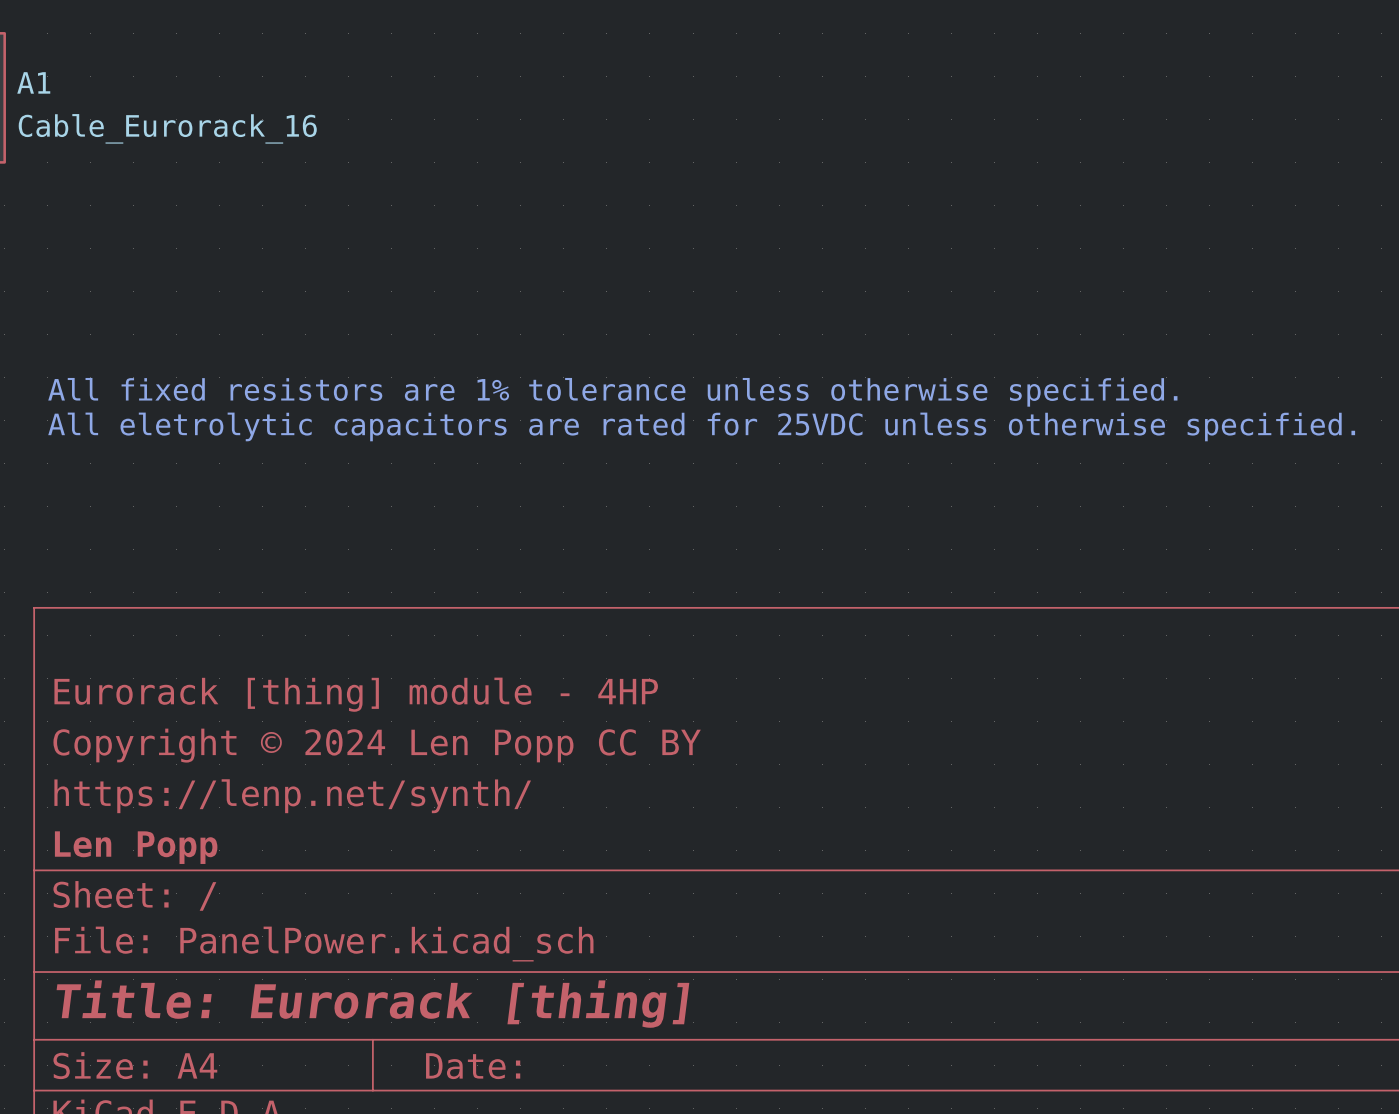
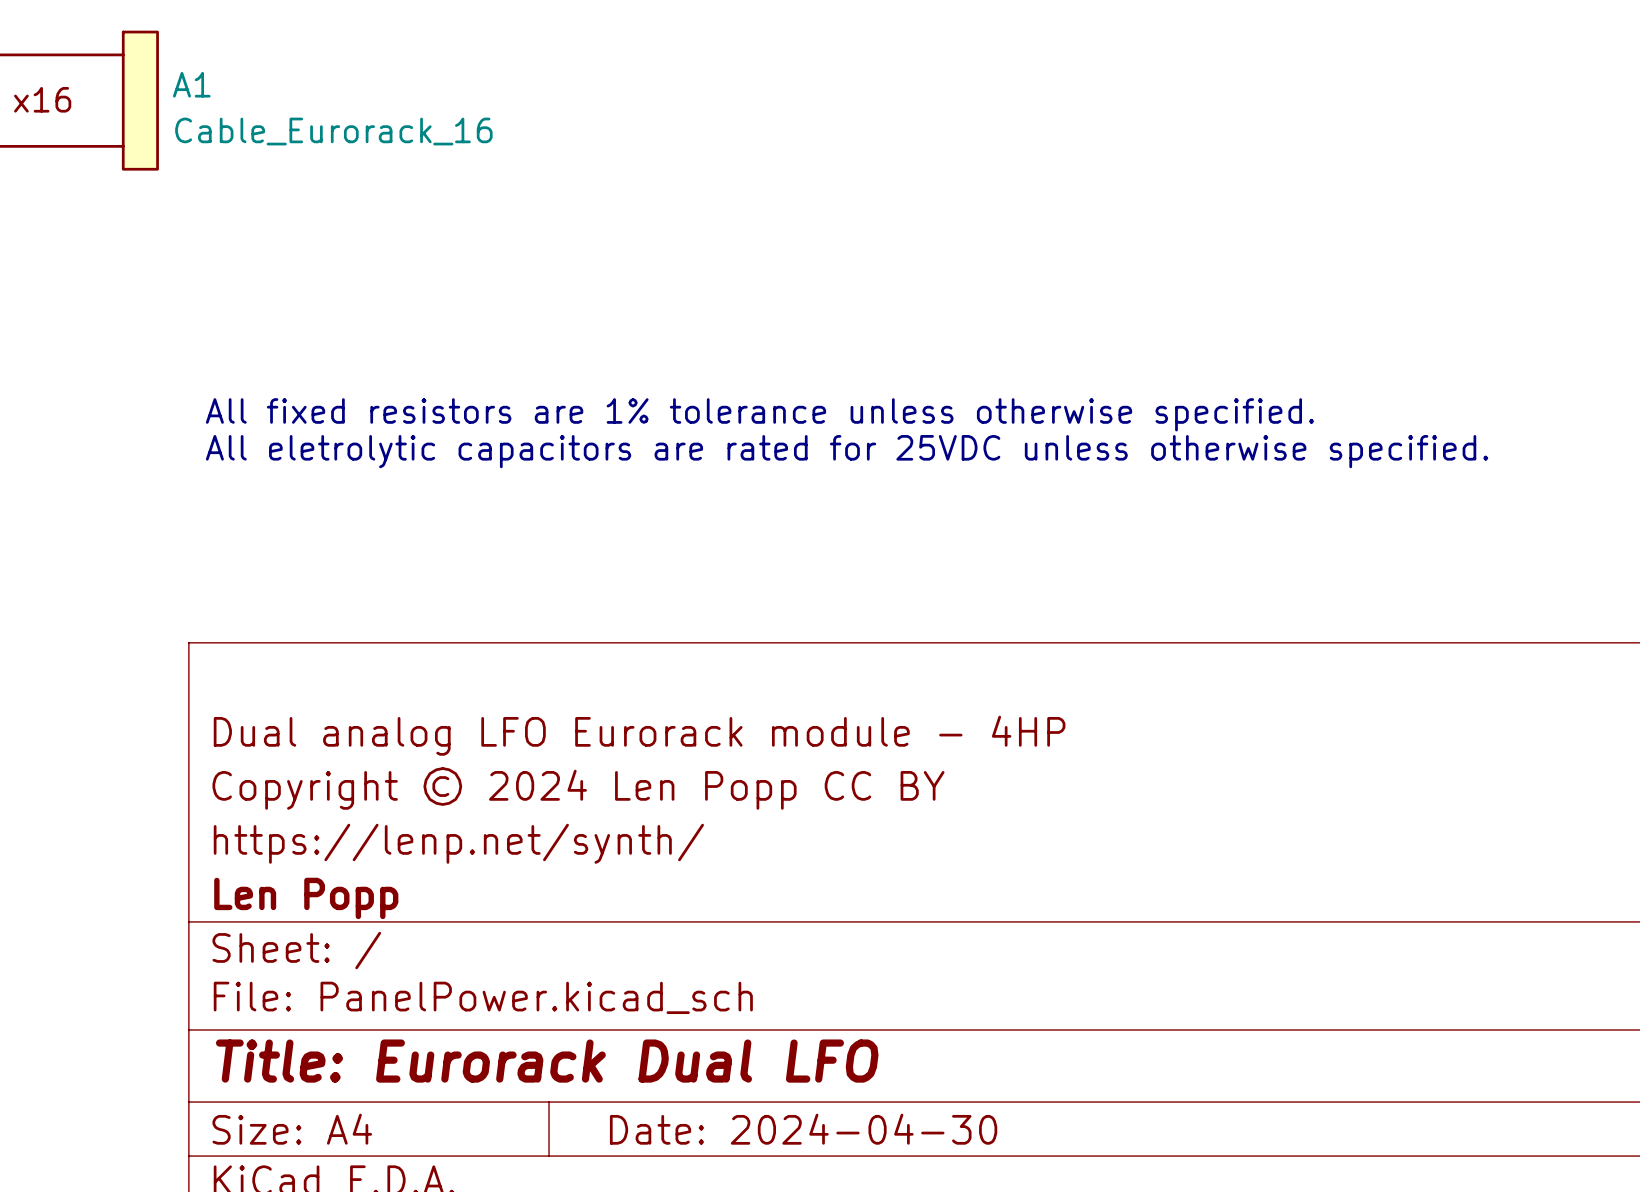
title block: Eurorack [thing] module - 4HP (356, 694) -> Dual analog LFO Eurorack module - 4HP (639, 735)
title block: Title: Eurorack [thing] (372, 1004) -> Title: Eurorack Dual LFO (547, 1061)
title block: Date: (473, 1066) -> Date: 2024-04-30 (803, 1129)

